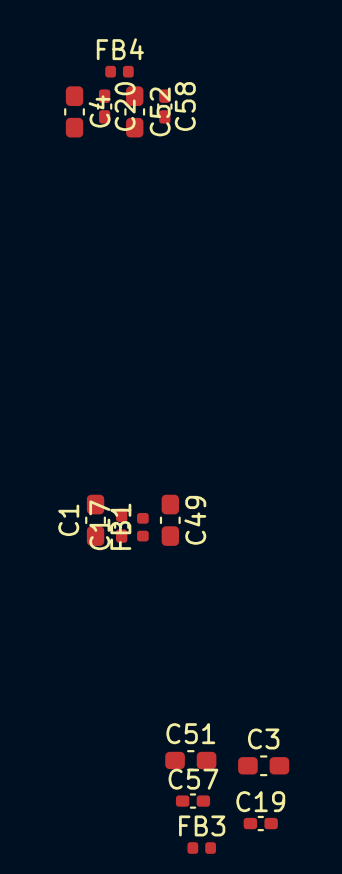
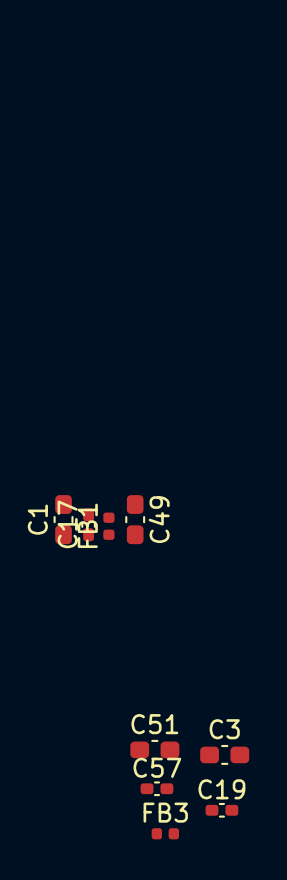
FB4: (119, 71) -> none
C20: (104, 106) -> none
C58: (164, 106) -> none
C4: (74, 111) -> none
C52: (134, 111) -> none

